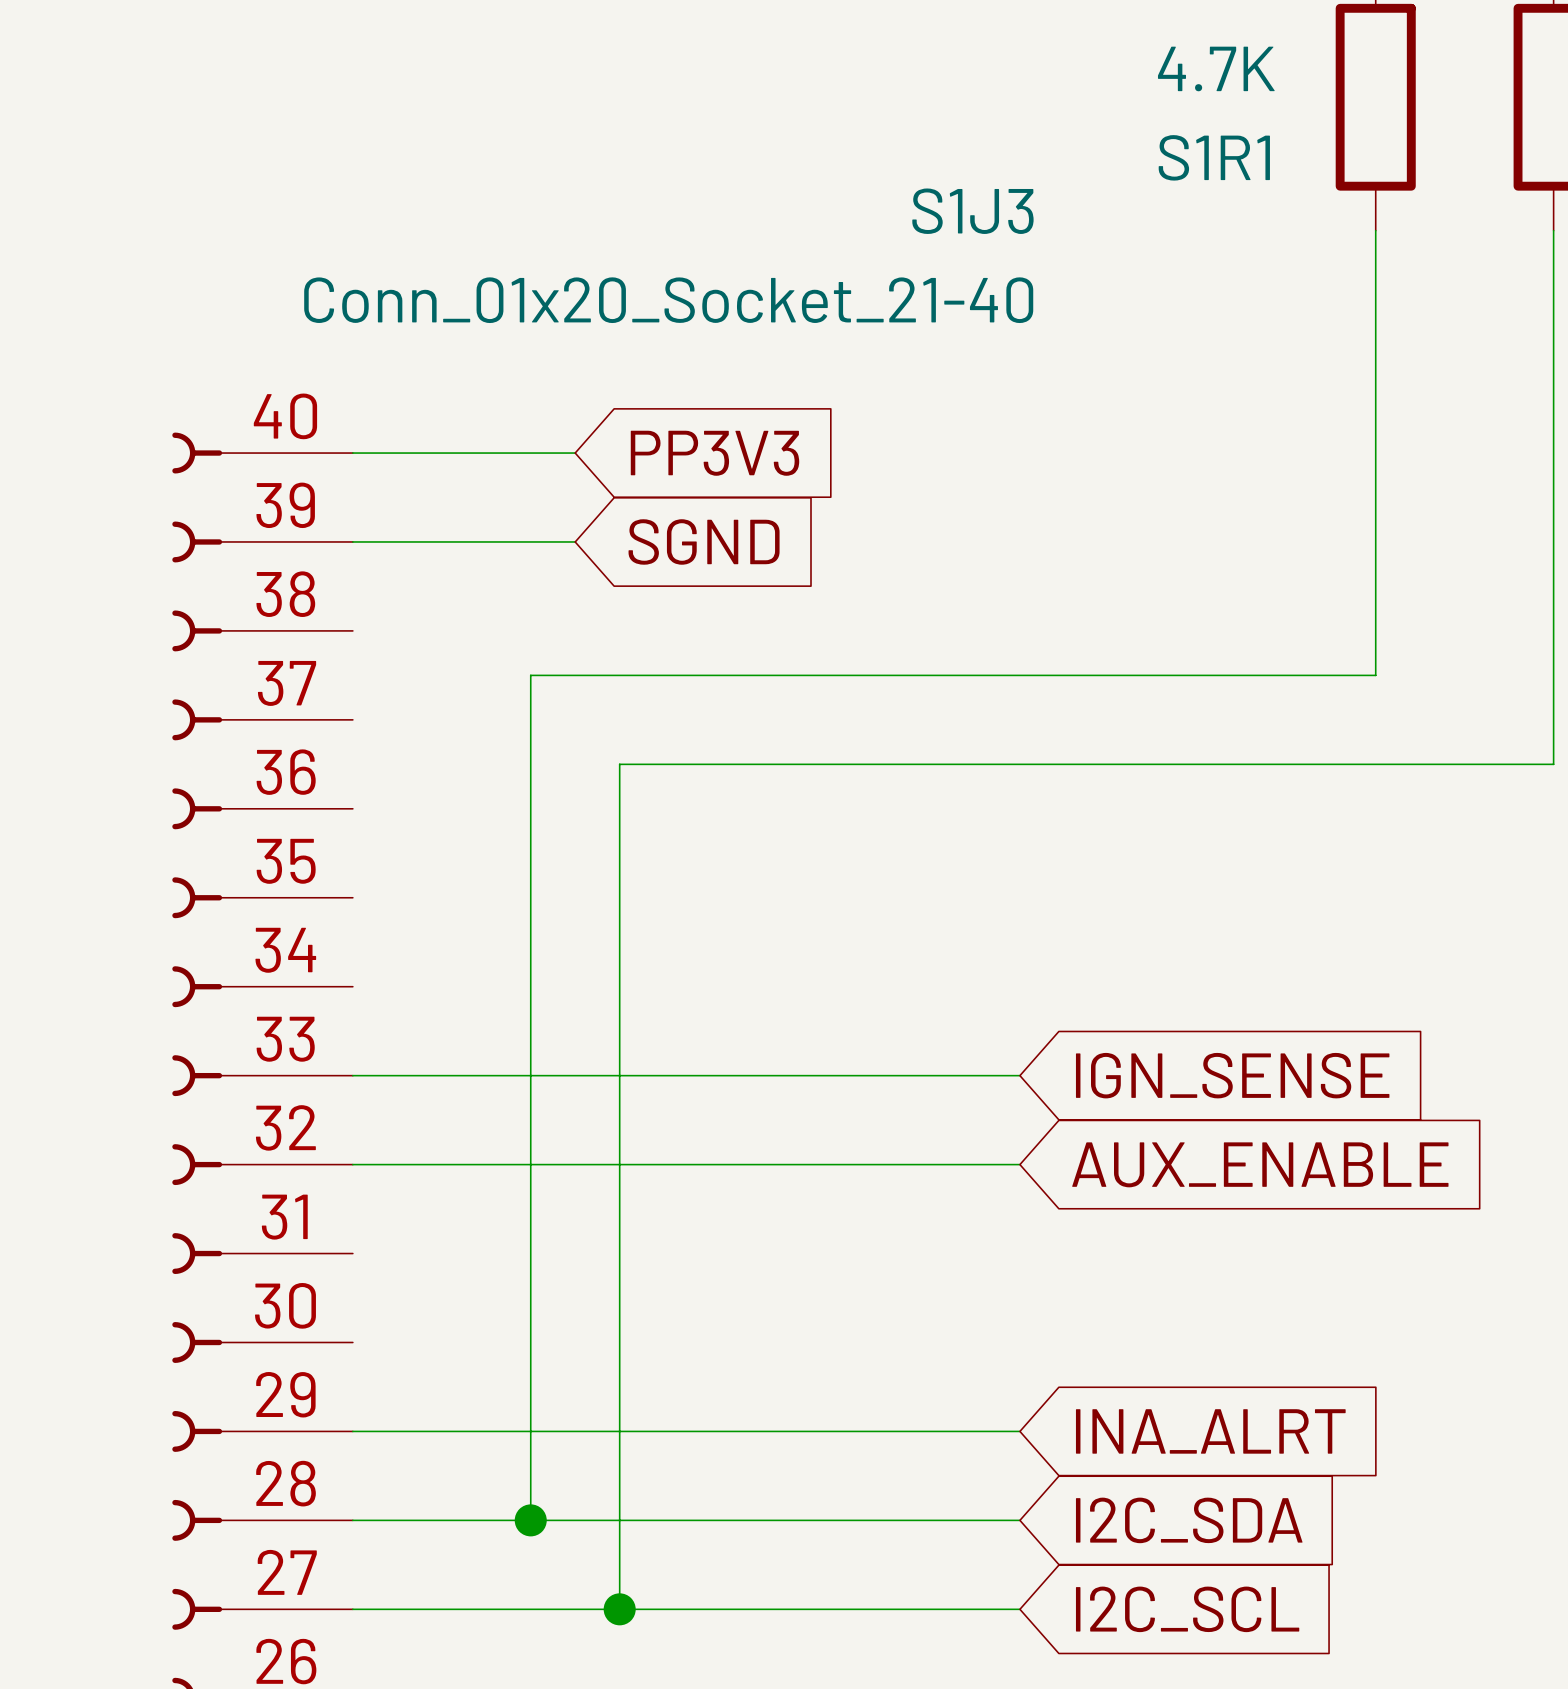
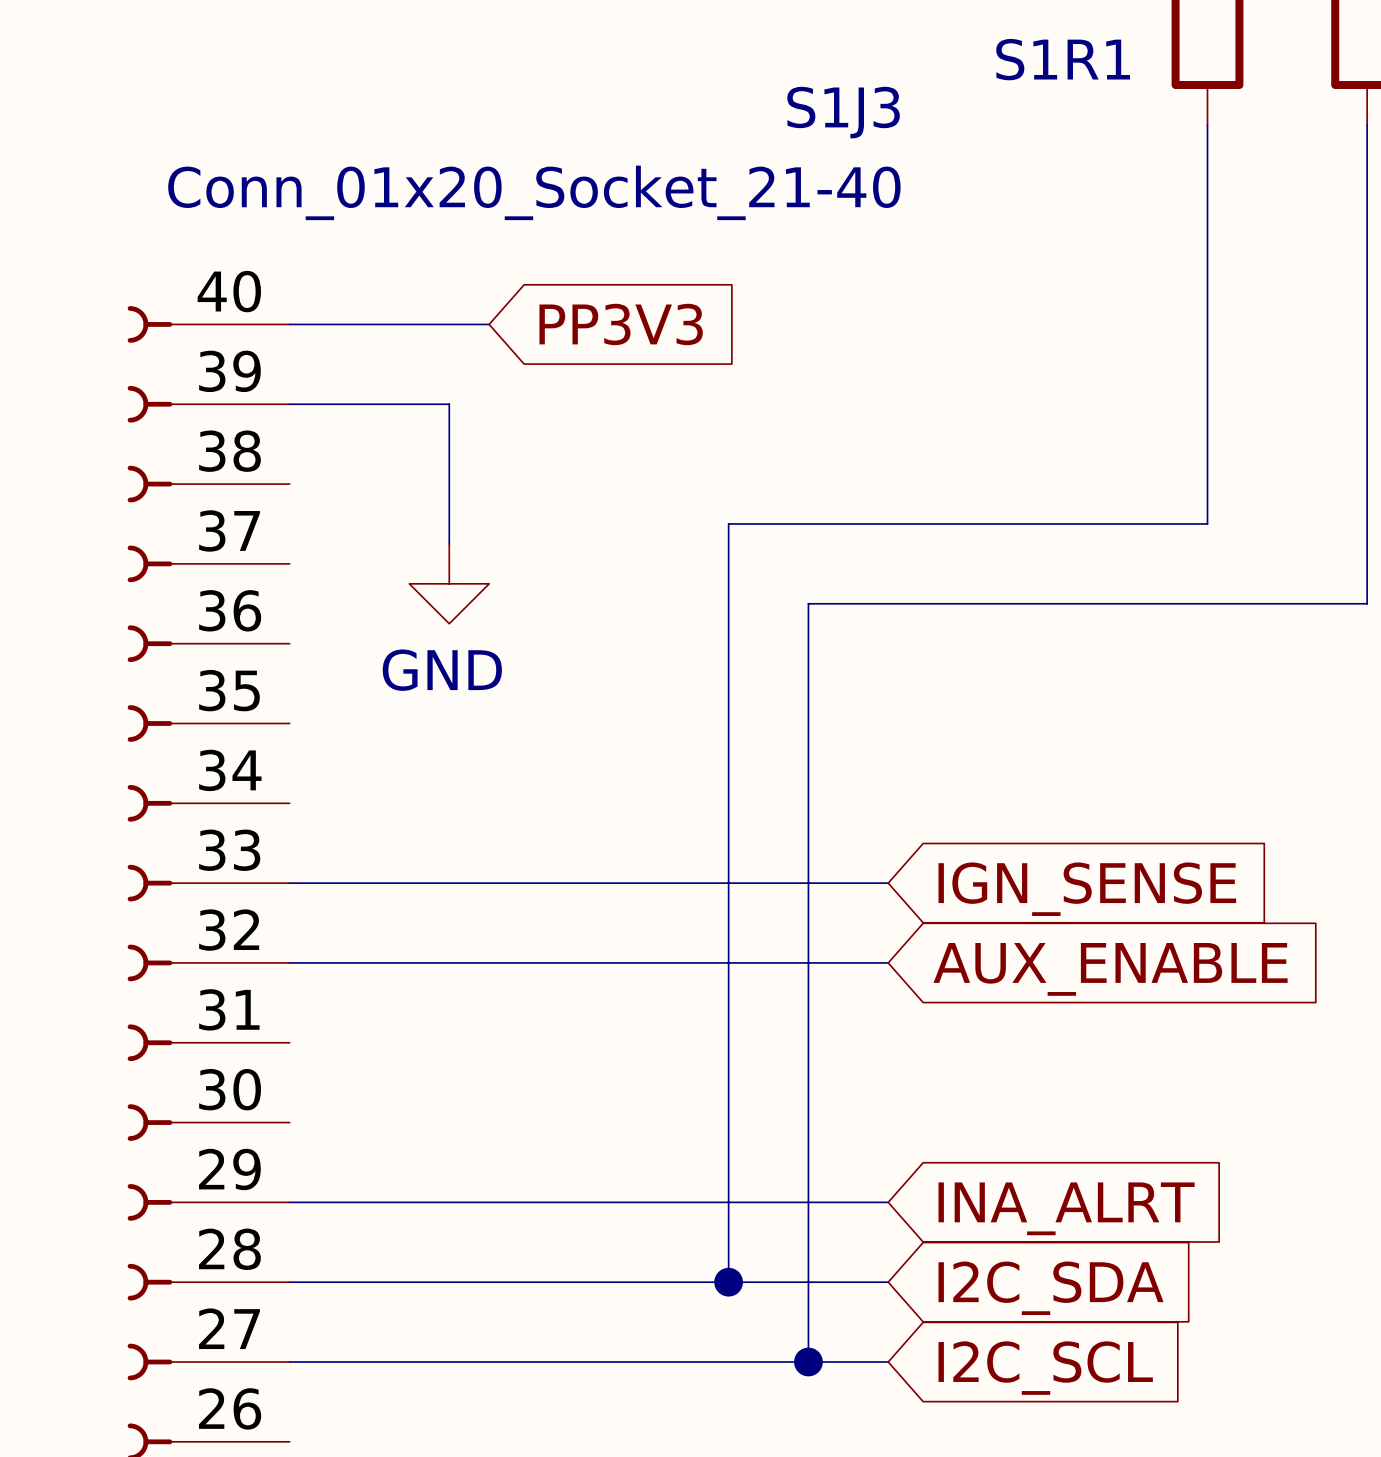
wire: (530, 541) (575, 541) -> (449, 404) (449, 523)
global label: SGND (704, 541) -> none
wire: (530, 675) (842, 675) -> (728, 1282) (728, 523)
wire: (530, 697) (530, 1520) -> none
power symbol: none -> GND (449, 583)
wire: (931, 764) (619, 764) (619, 1609) -> (808, 603) (808, 1362)
junction: (530, 1520) -> none
junction: none -> (728, 1282)
junction: (619, 1609) -> none
junction: none -> (808, 1362)

